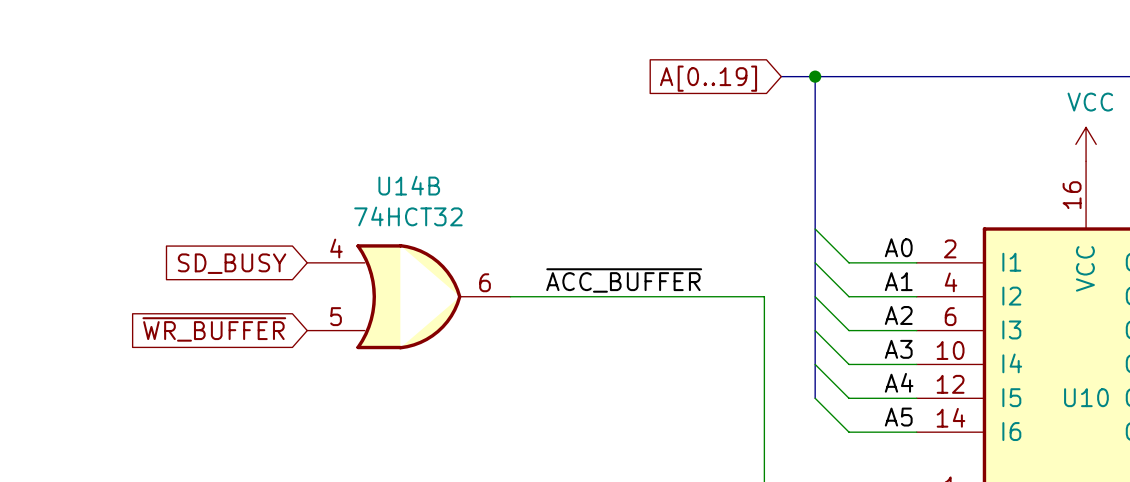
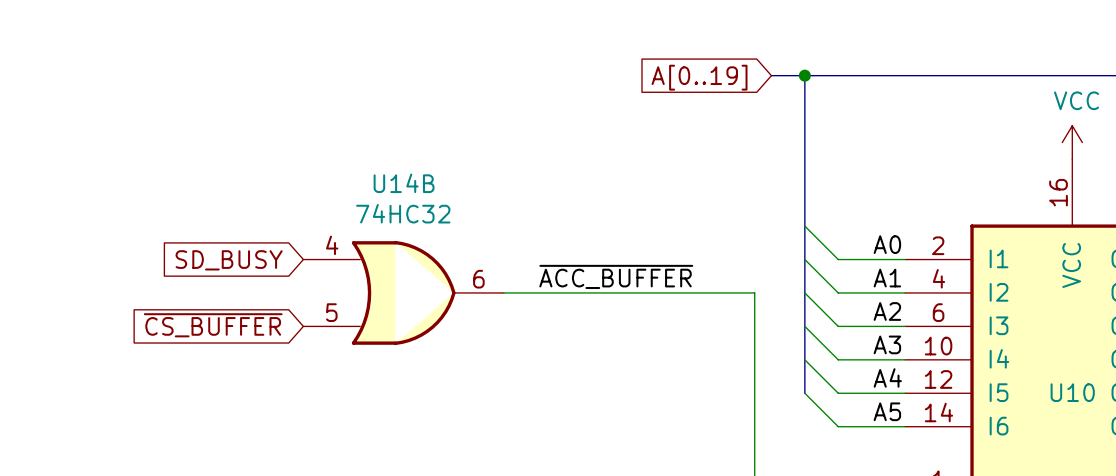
U14B value: 74HCT32 (408, 216) -> 74HC32 (403, 213)
global label: ~{WR_BUFFER} (214, 329) -> ~{CS_BUFFER} (213, 325)

